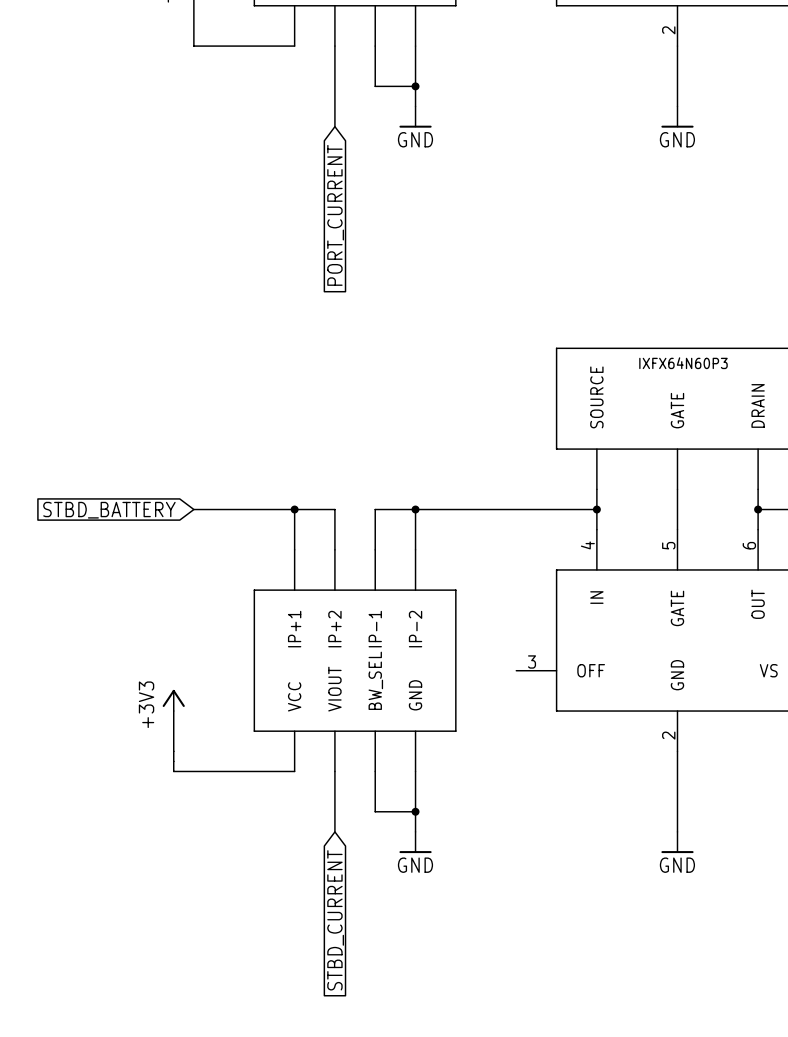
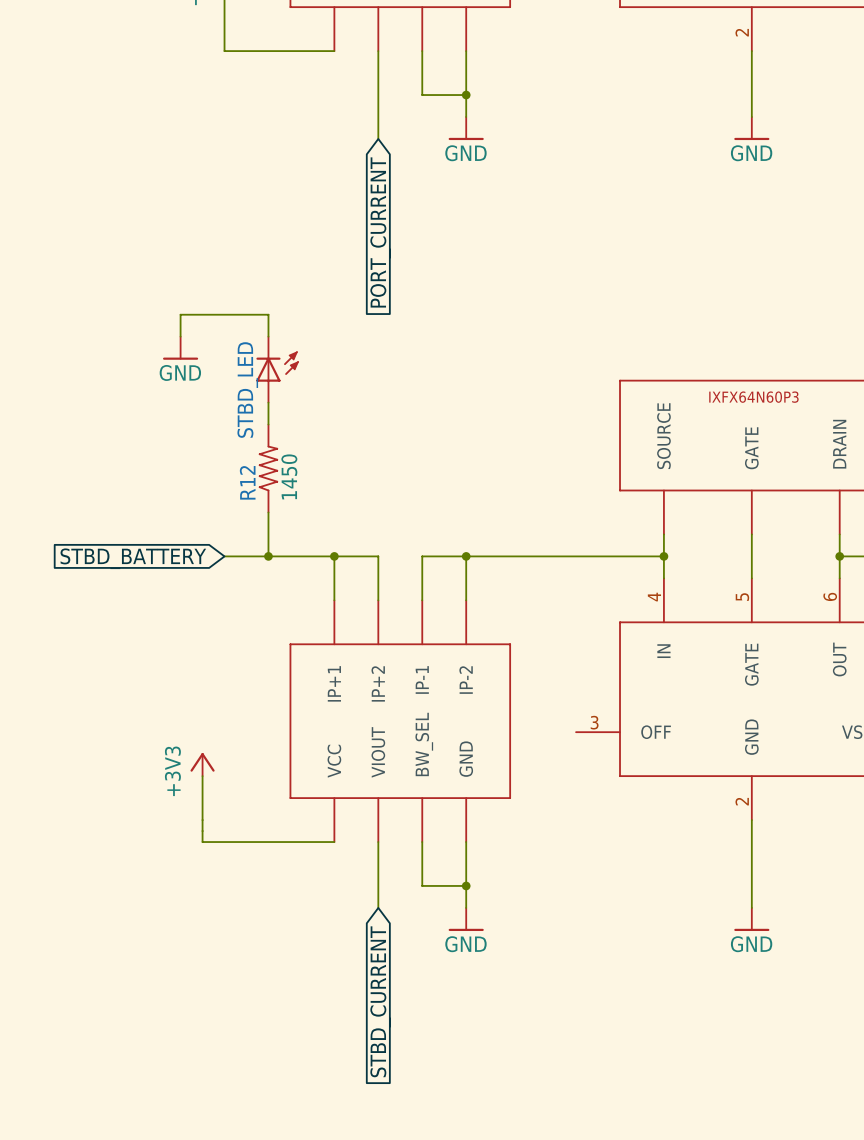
wire: none -> (180, 336) (180, 314) (268, 314) (268, 336)
power symbol: none -> GND (180, 348)
STBD_LED: none -> (277, 369)
wire: none -> (268, 402) (268, 424)
R12: none -> 1450 (268, 468)
wire: none -> (268, 512) (268, 556)
junction: none -> (268, 556)

